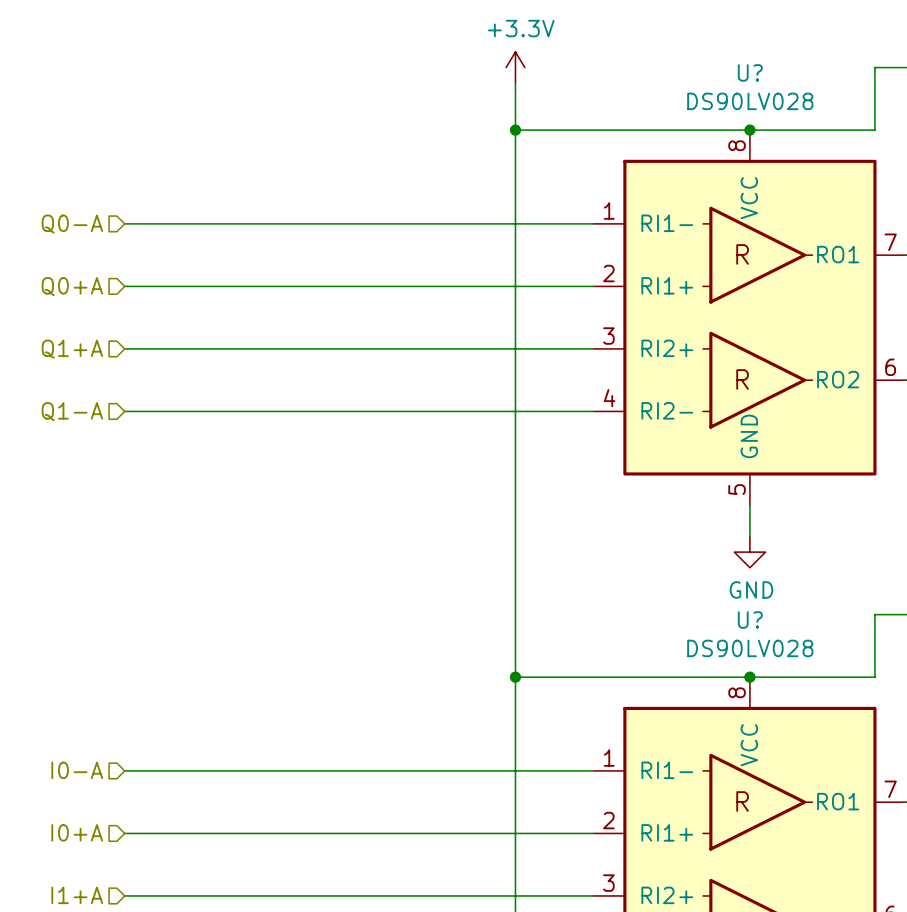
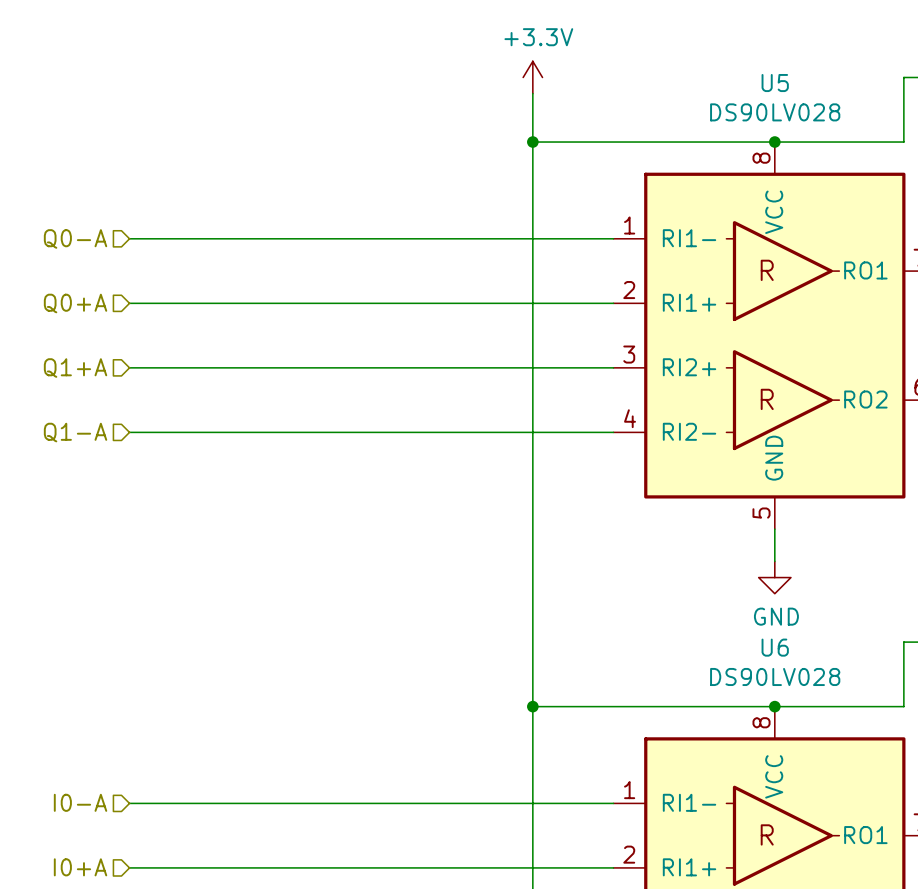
U? name: U? (750, 72) -> U5 (775, 83)
U? name: U? (750, 619) -> U6 (775, 647)

